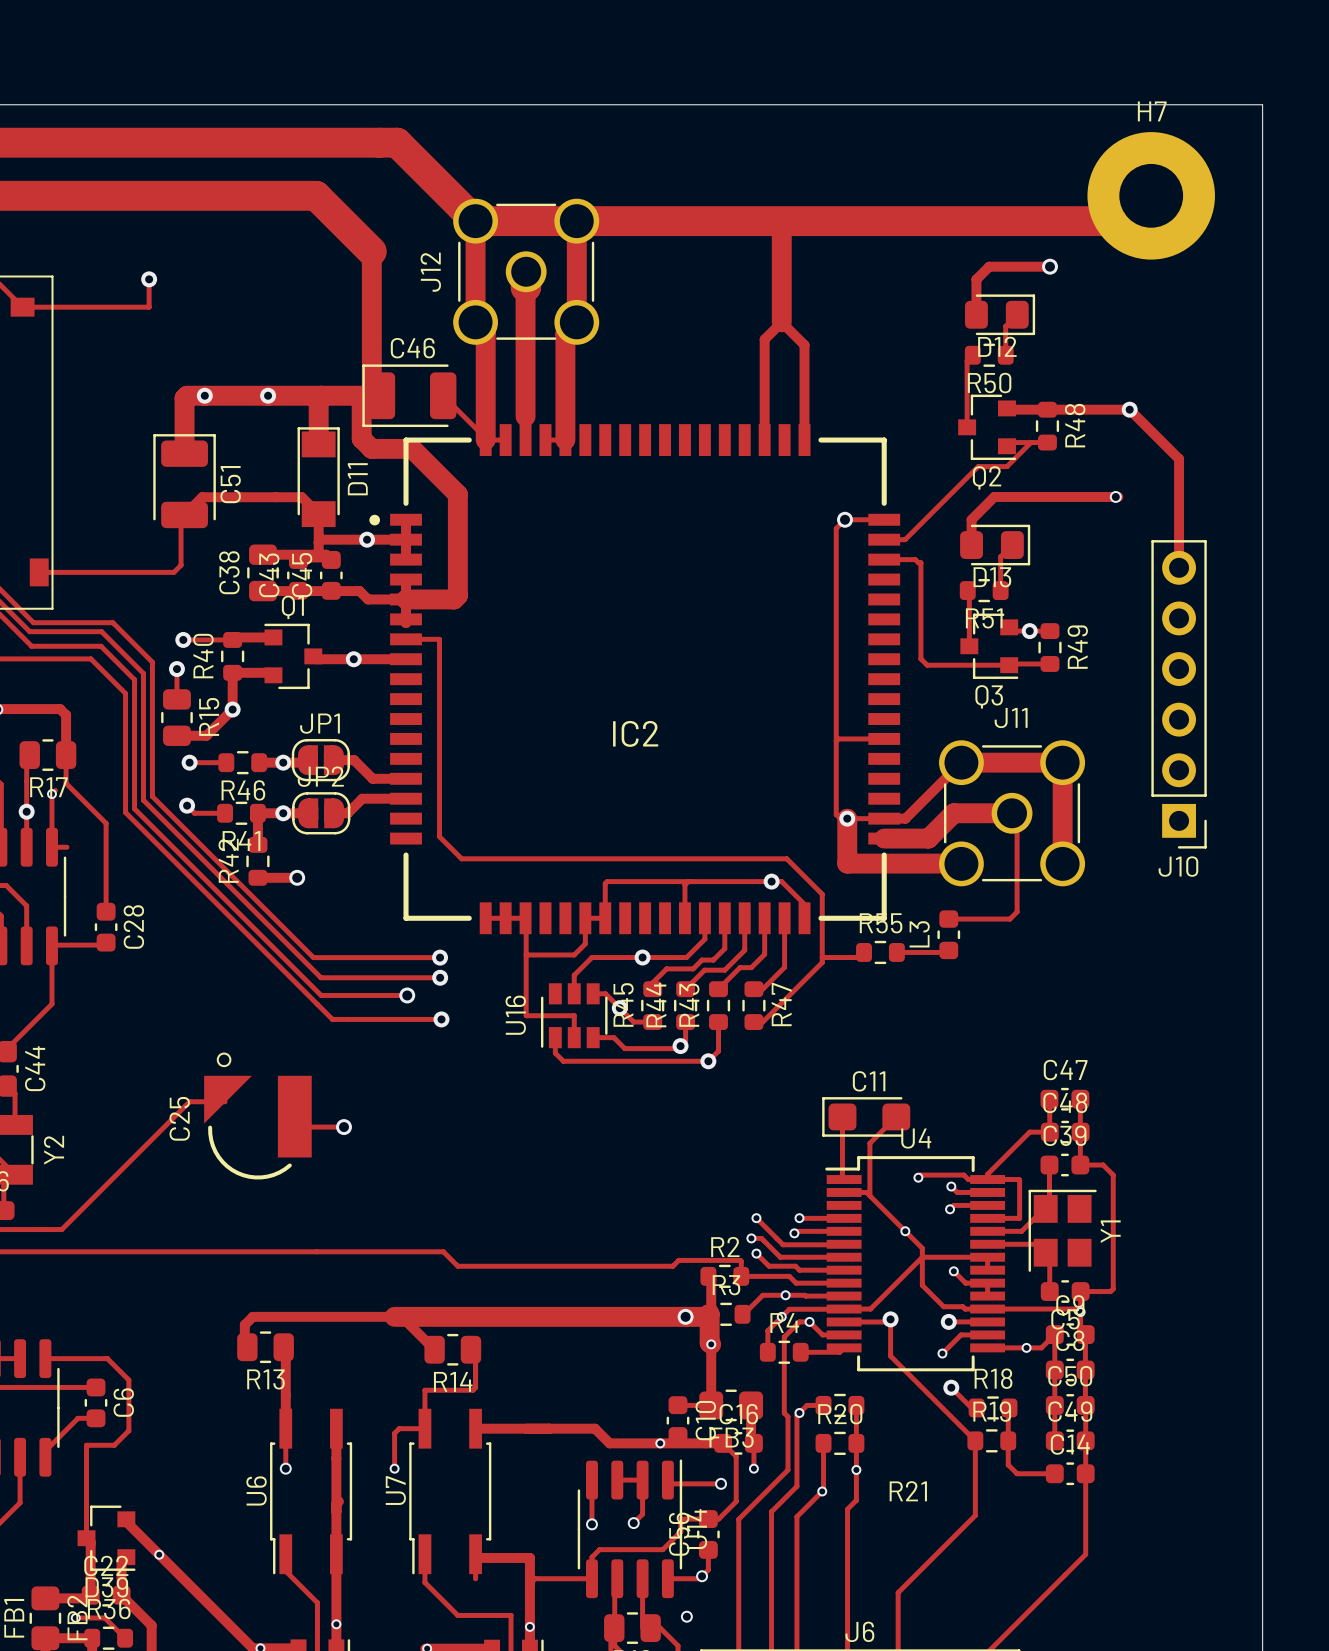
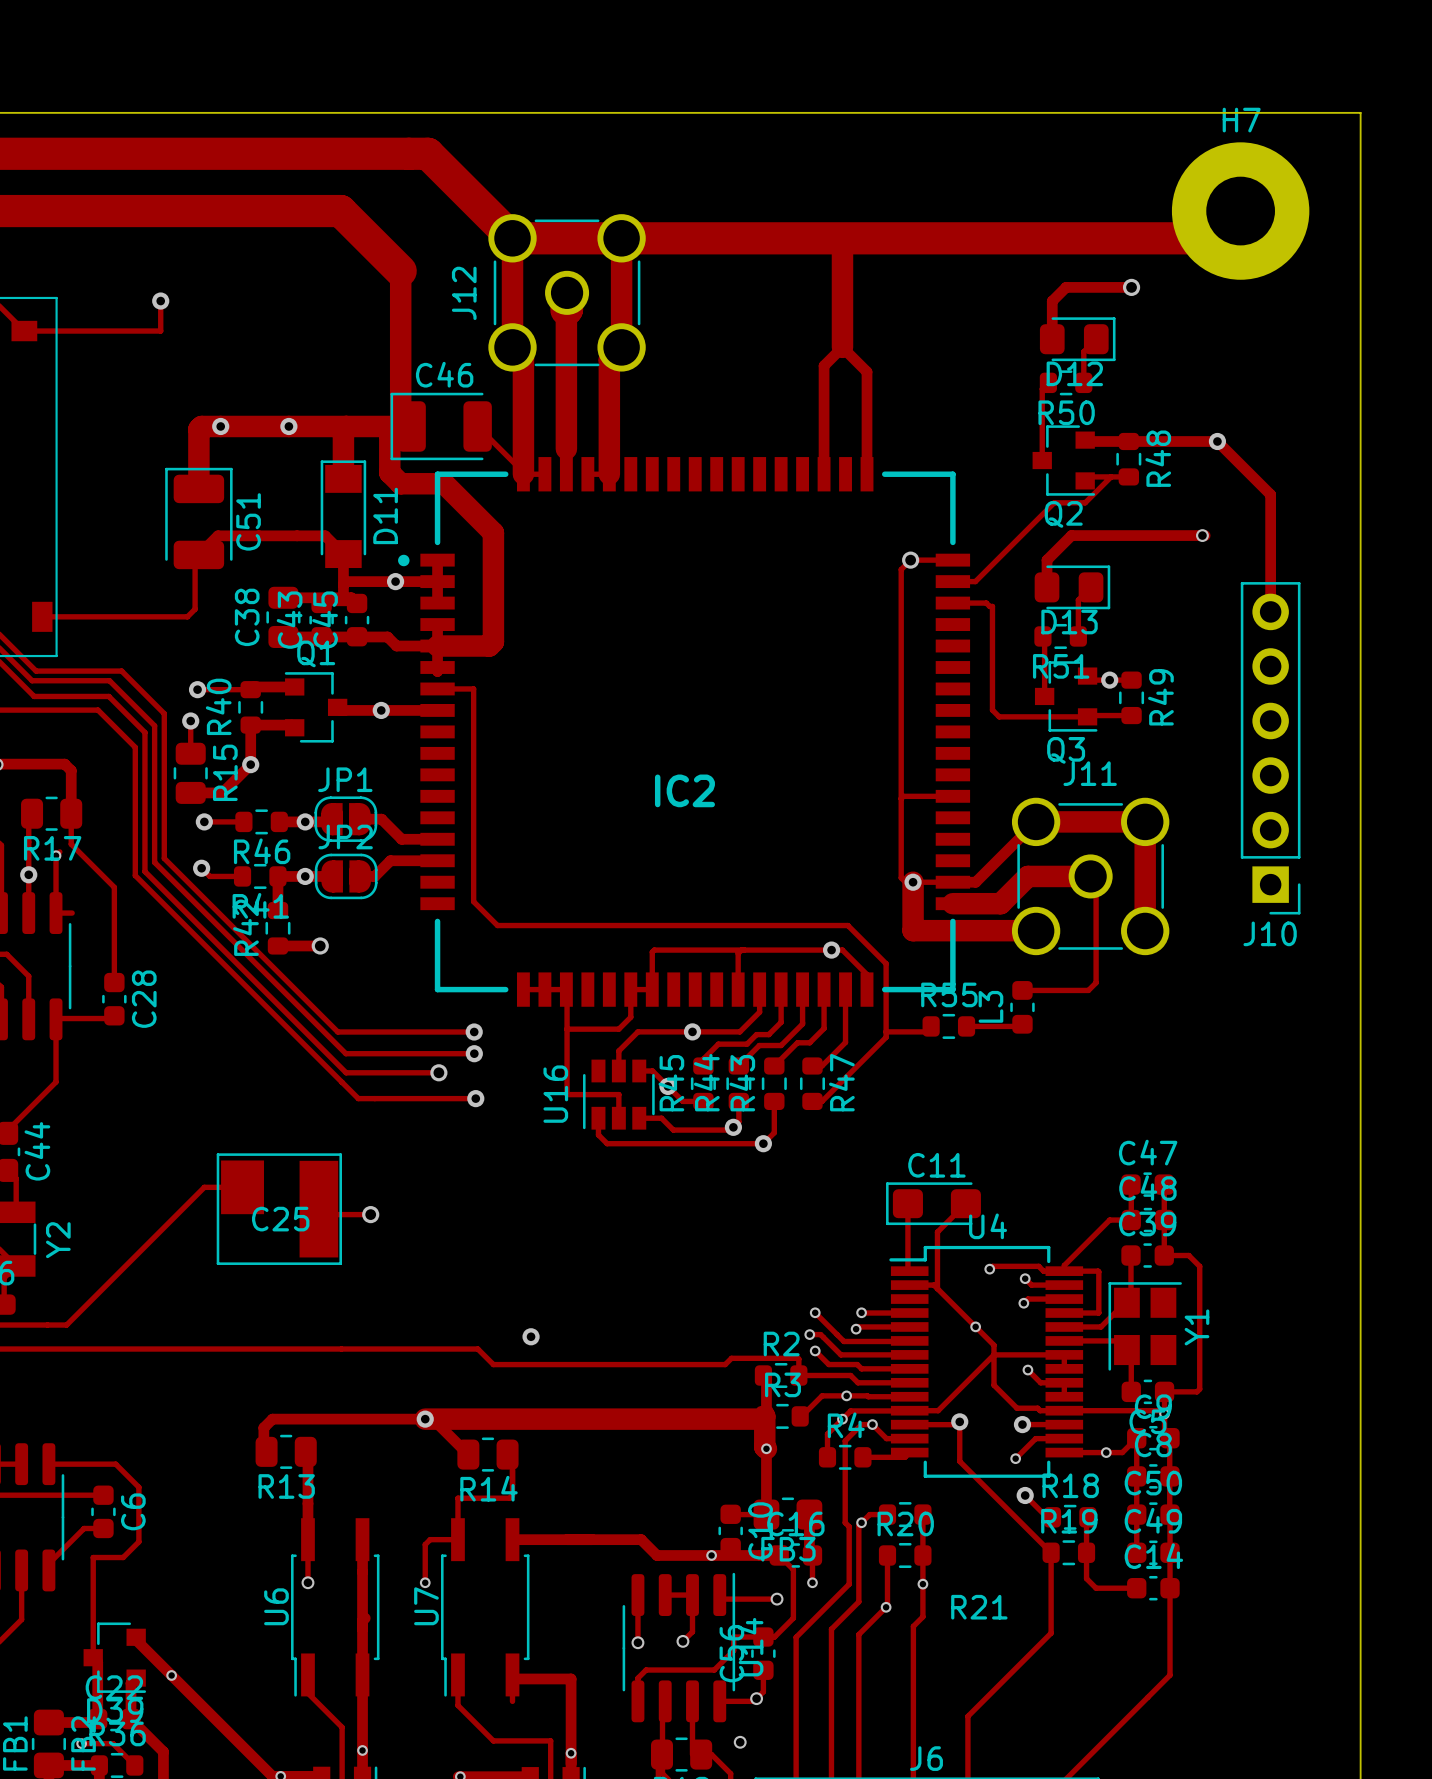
C25 footprint: [204, 1052, 312, 1180] -> [216, 1153, 342, 1265]
C25 name position: C25 (179, 1118) -> C25 (280, 1219)
via: none -> (531, 1336)
via: none -> (425, 1419)
via: (685, 1316) -> none
track: (591, 1578) (534, 1578) (529, 1583) -> none

